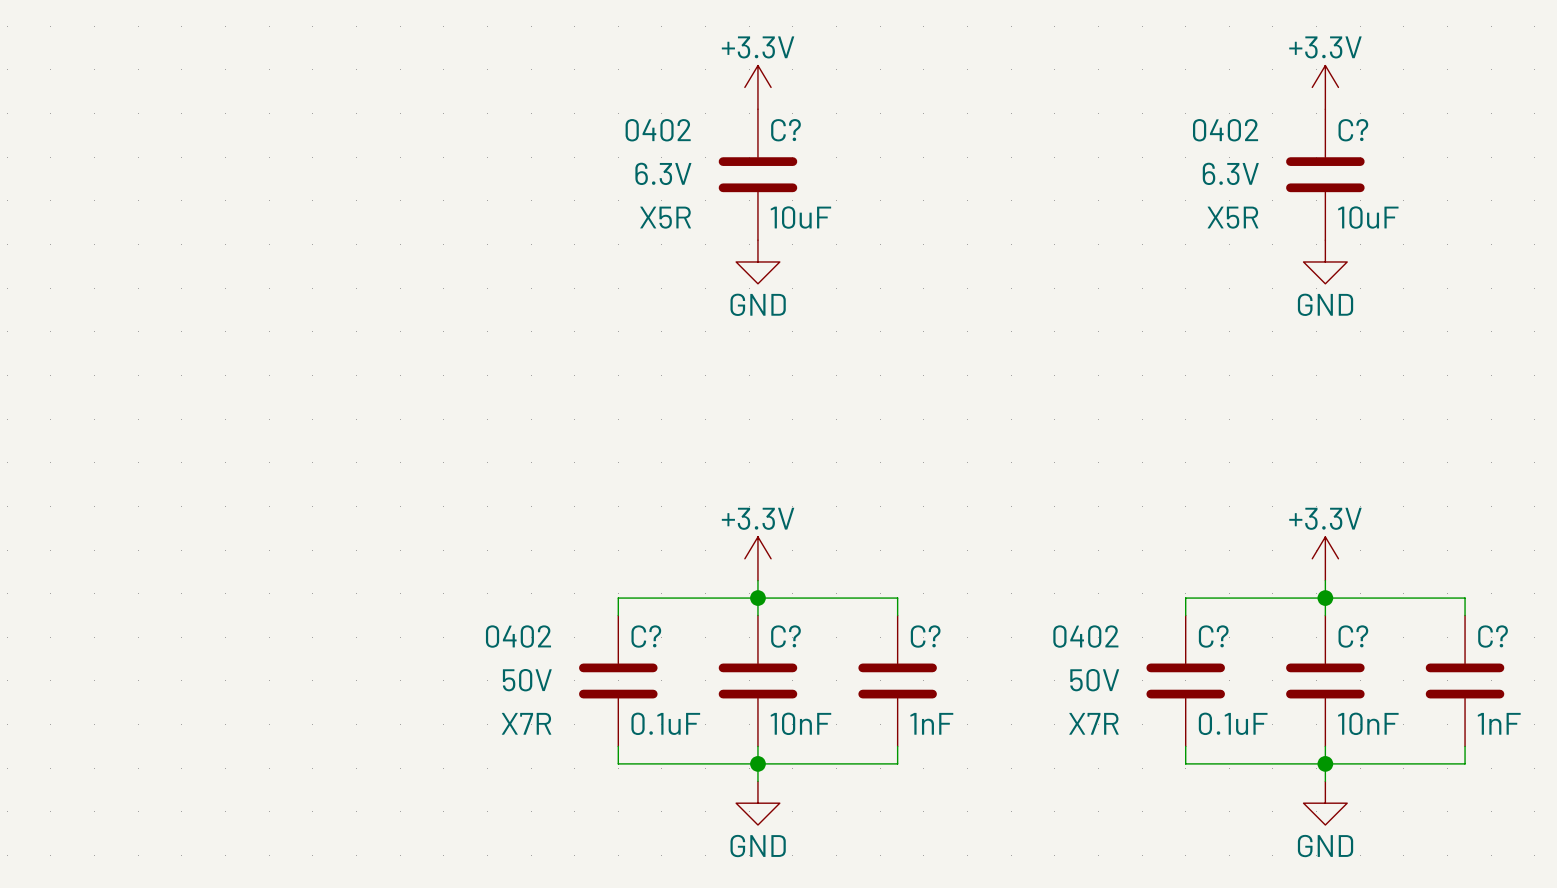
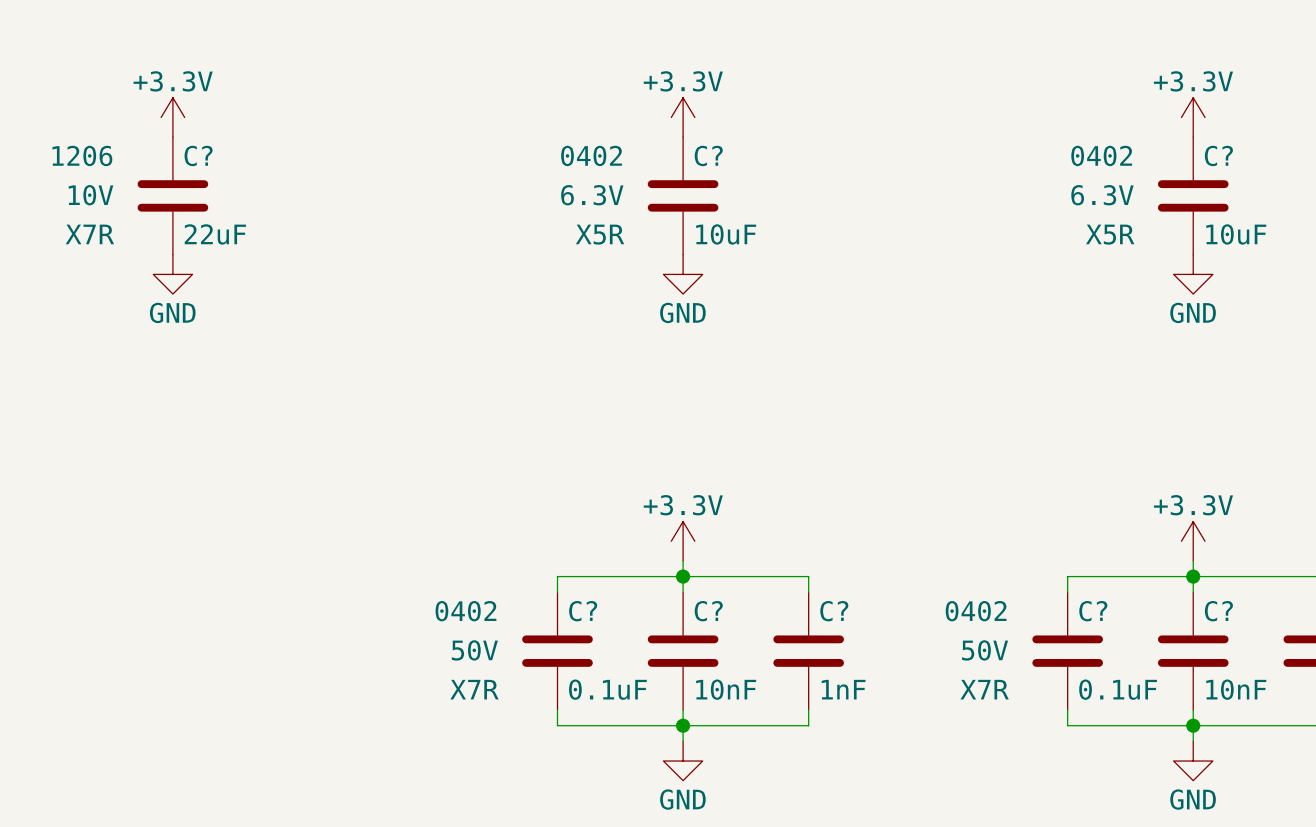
power symbol: none -> +3.3V (172, 117)
C?: none -> 22uF (172, 195)
power symbol: none -> GND (172, 274)

